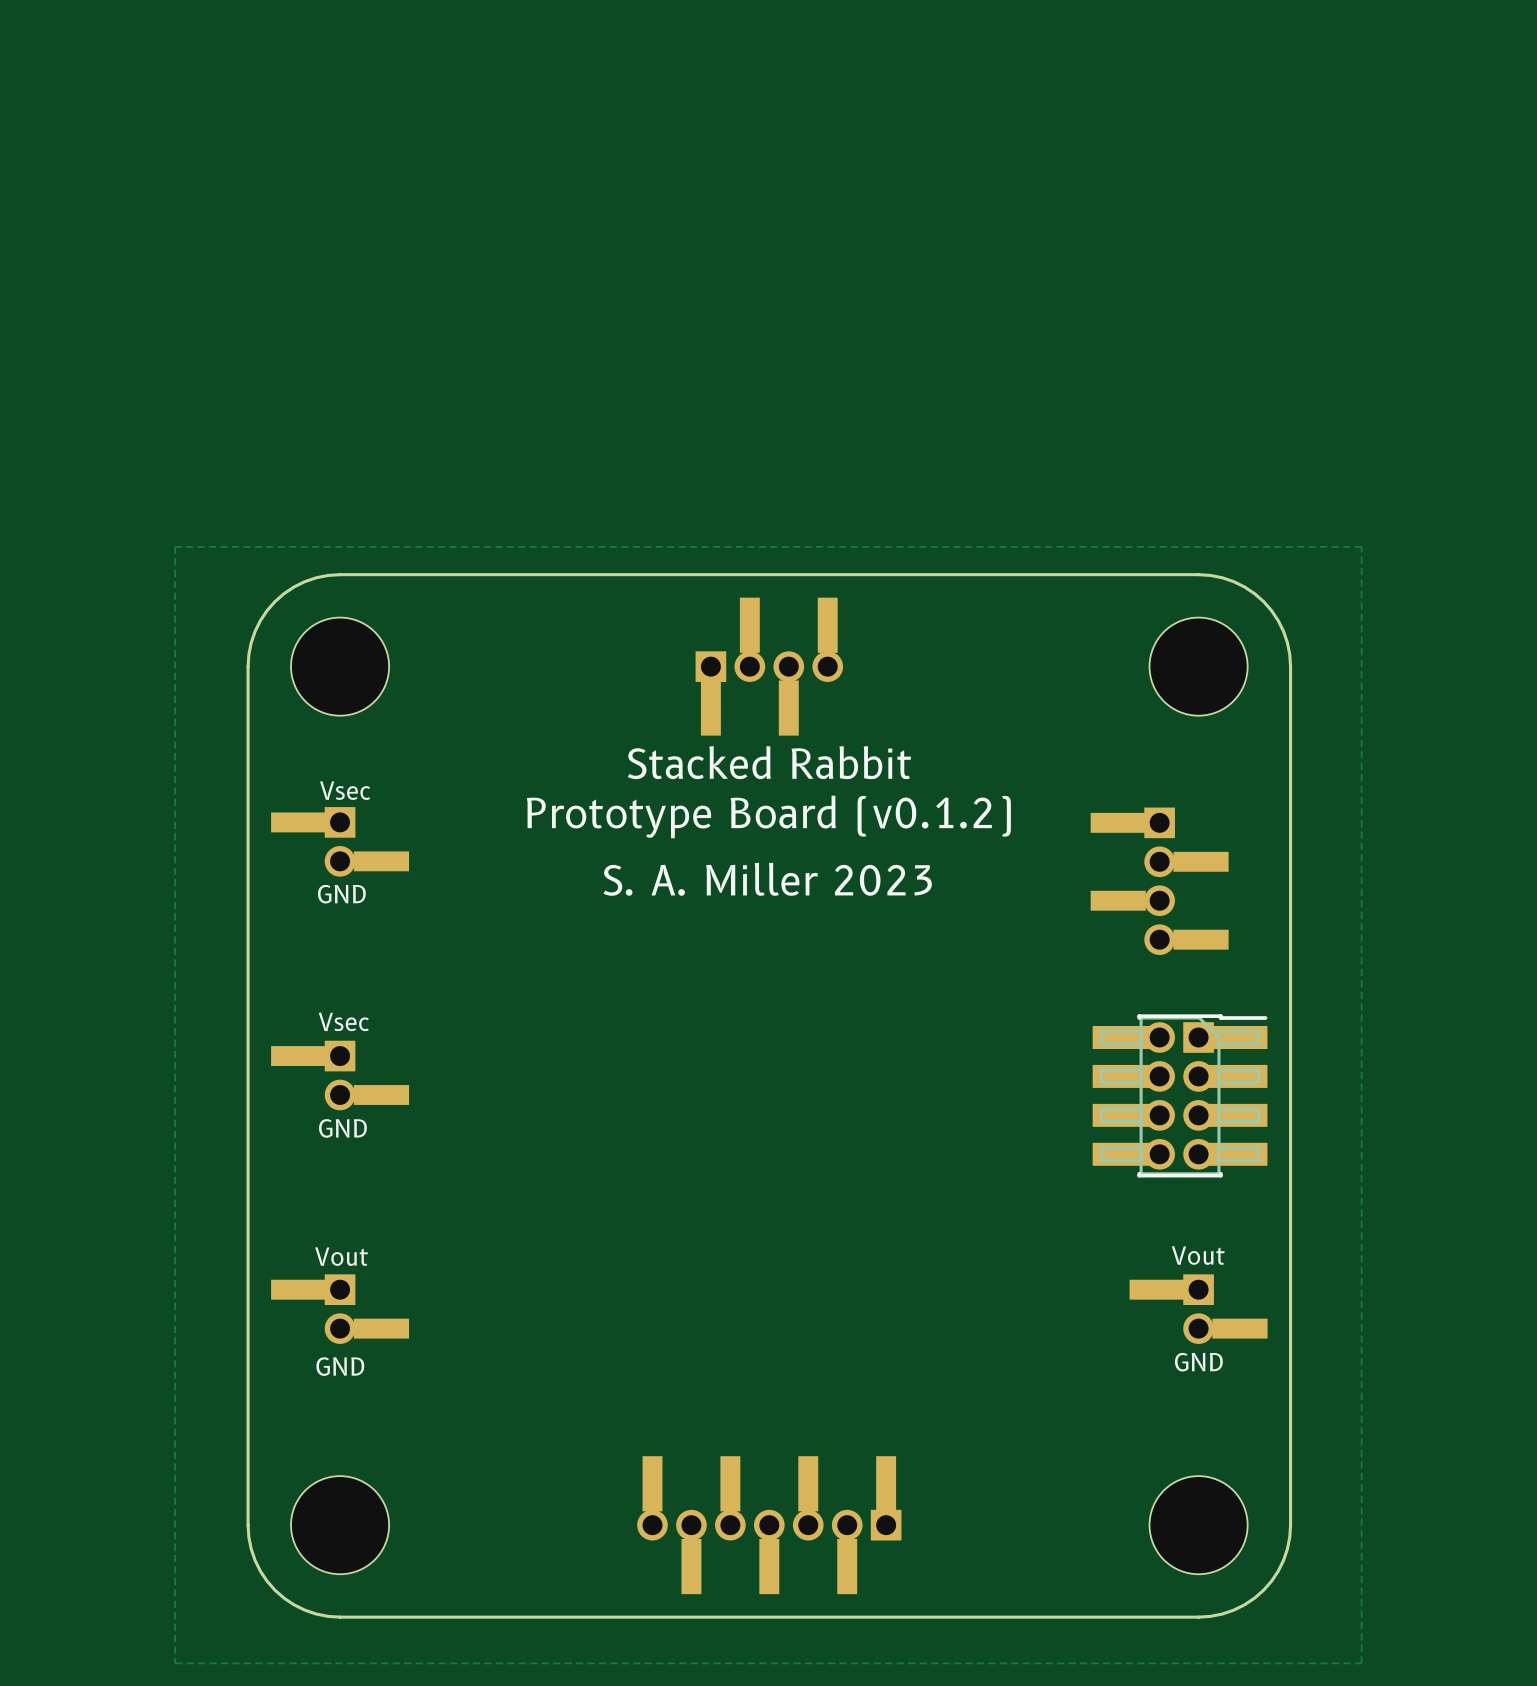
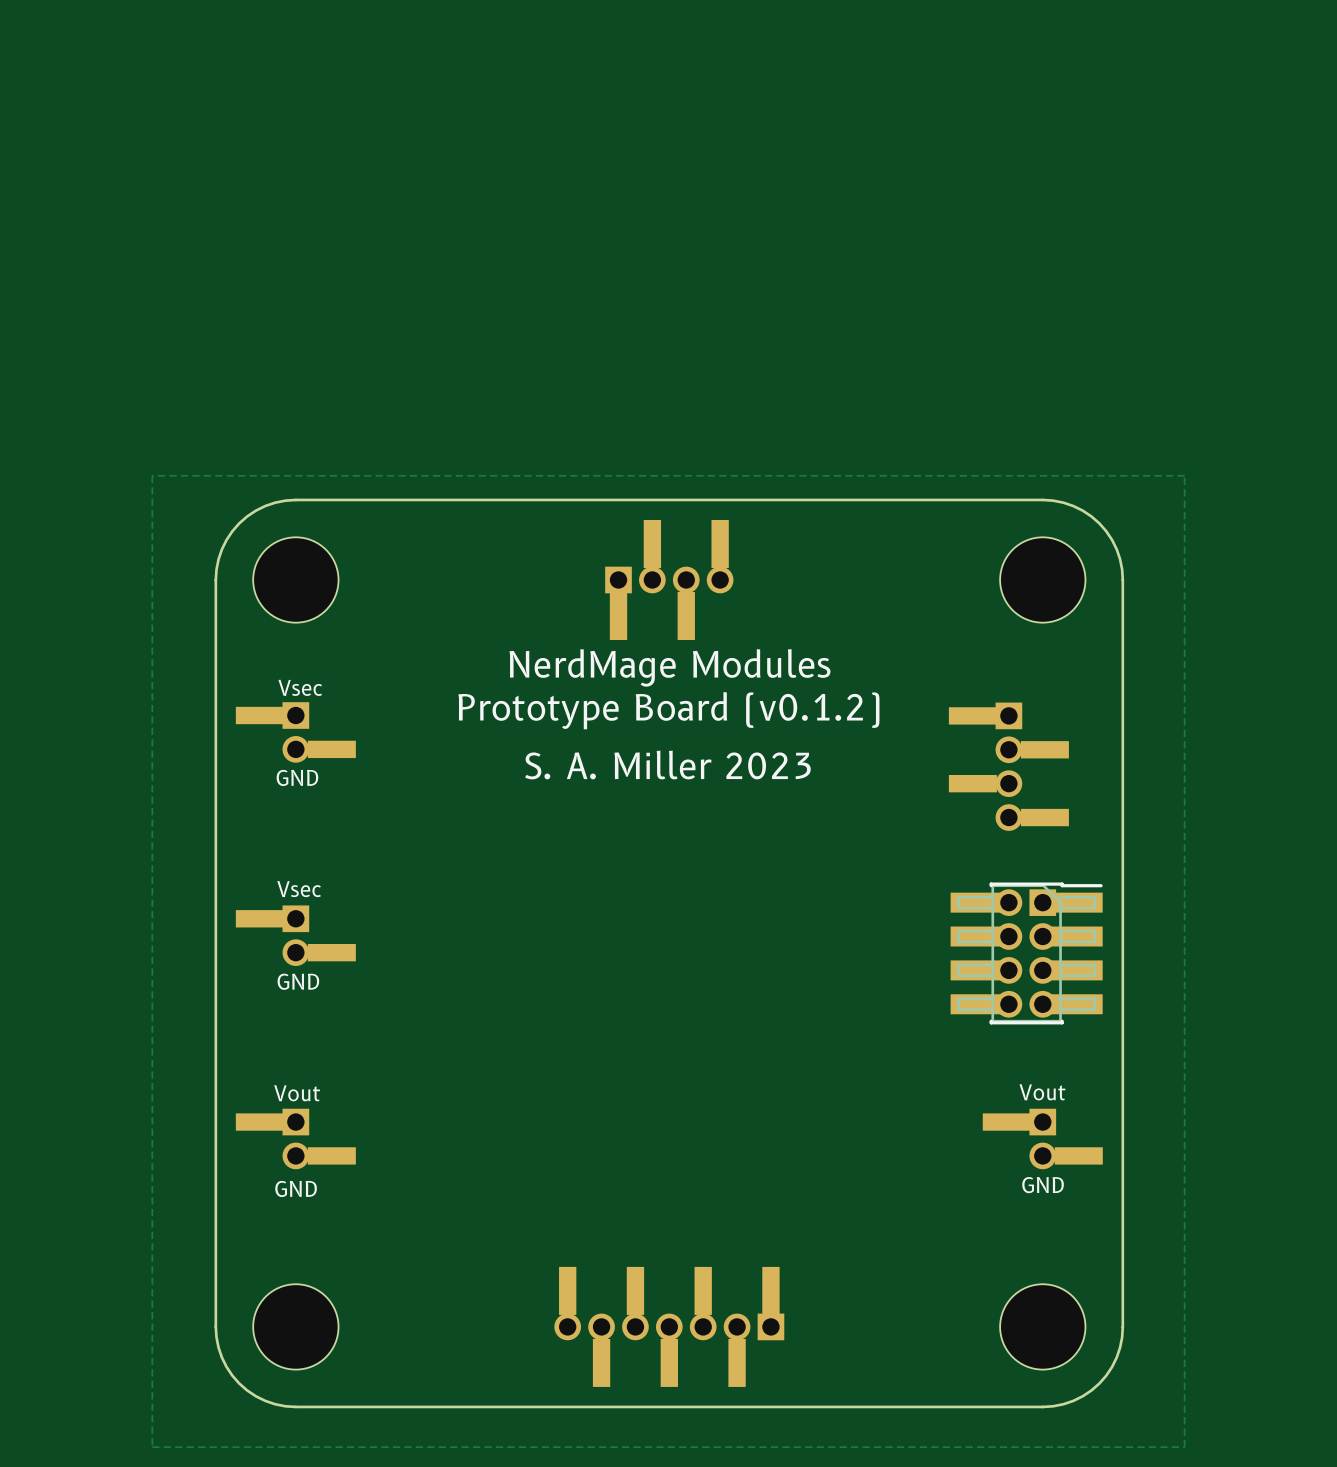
text: Stacked Rabbit (769, 762) -> NerdMage Modules (669, 667)

